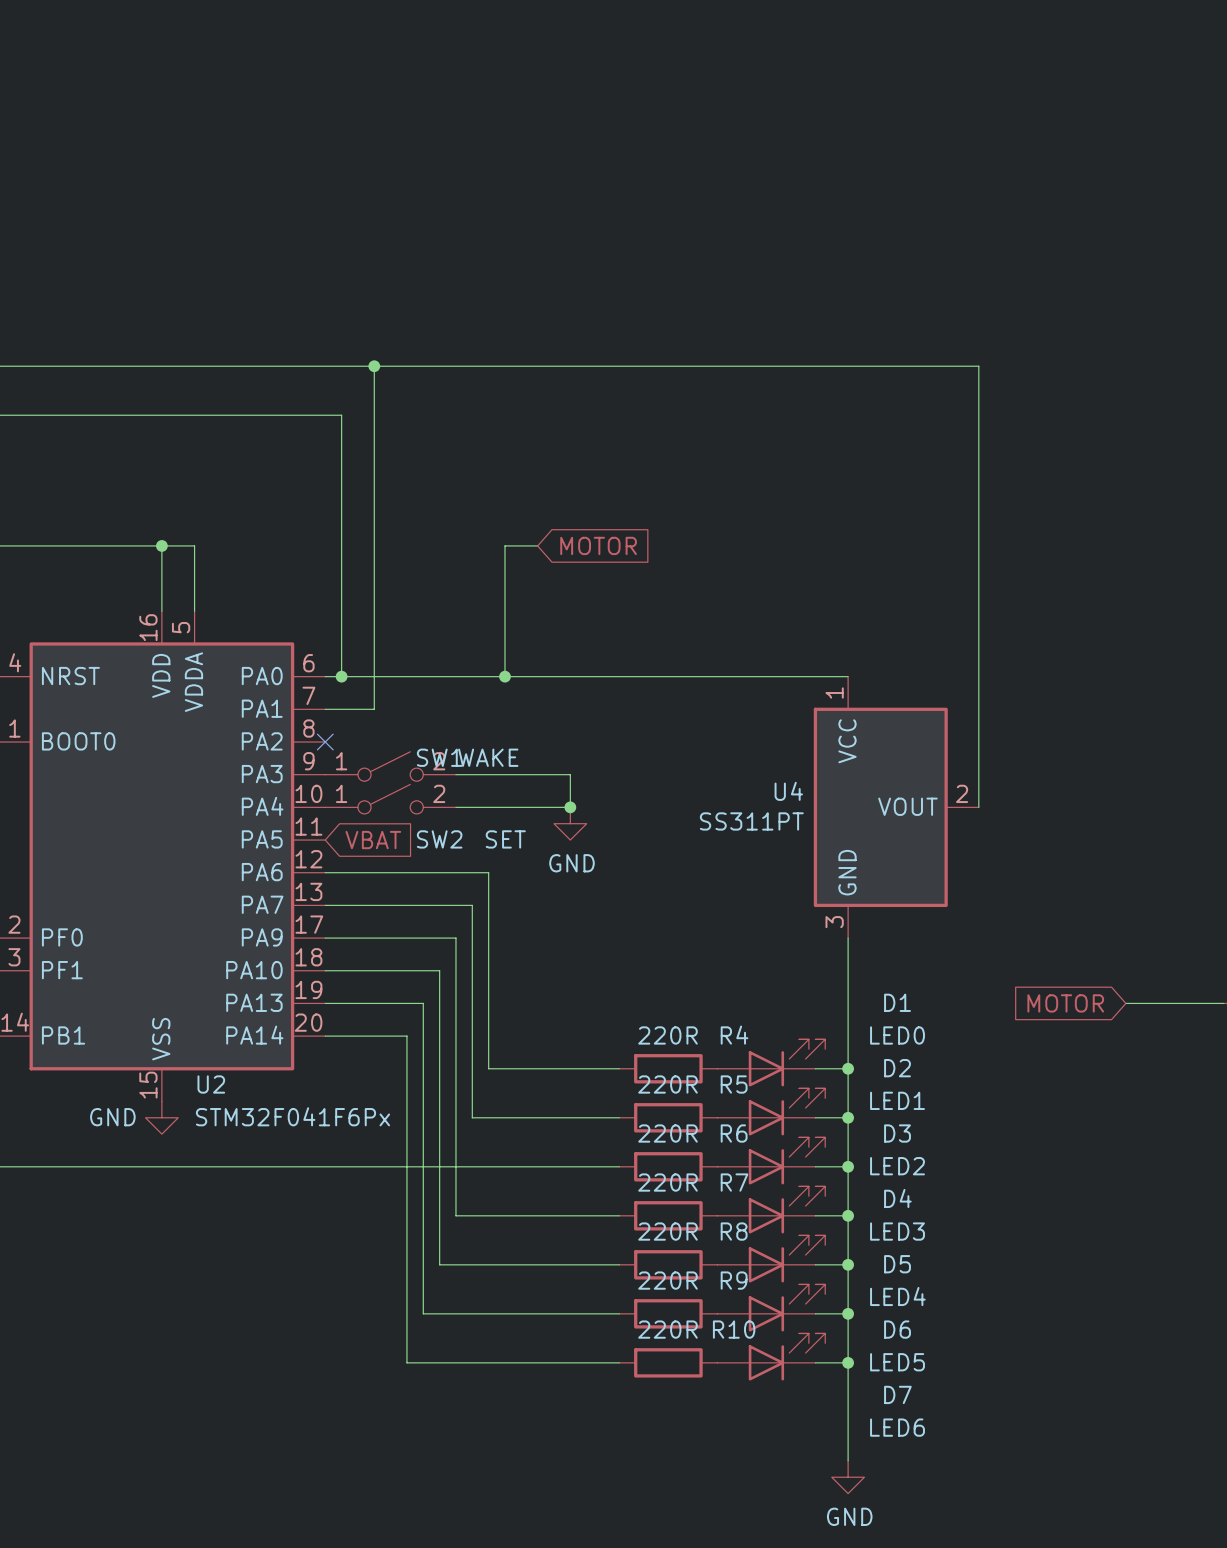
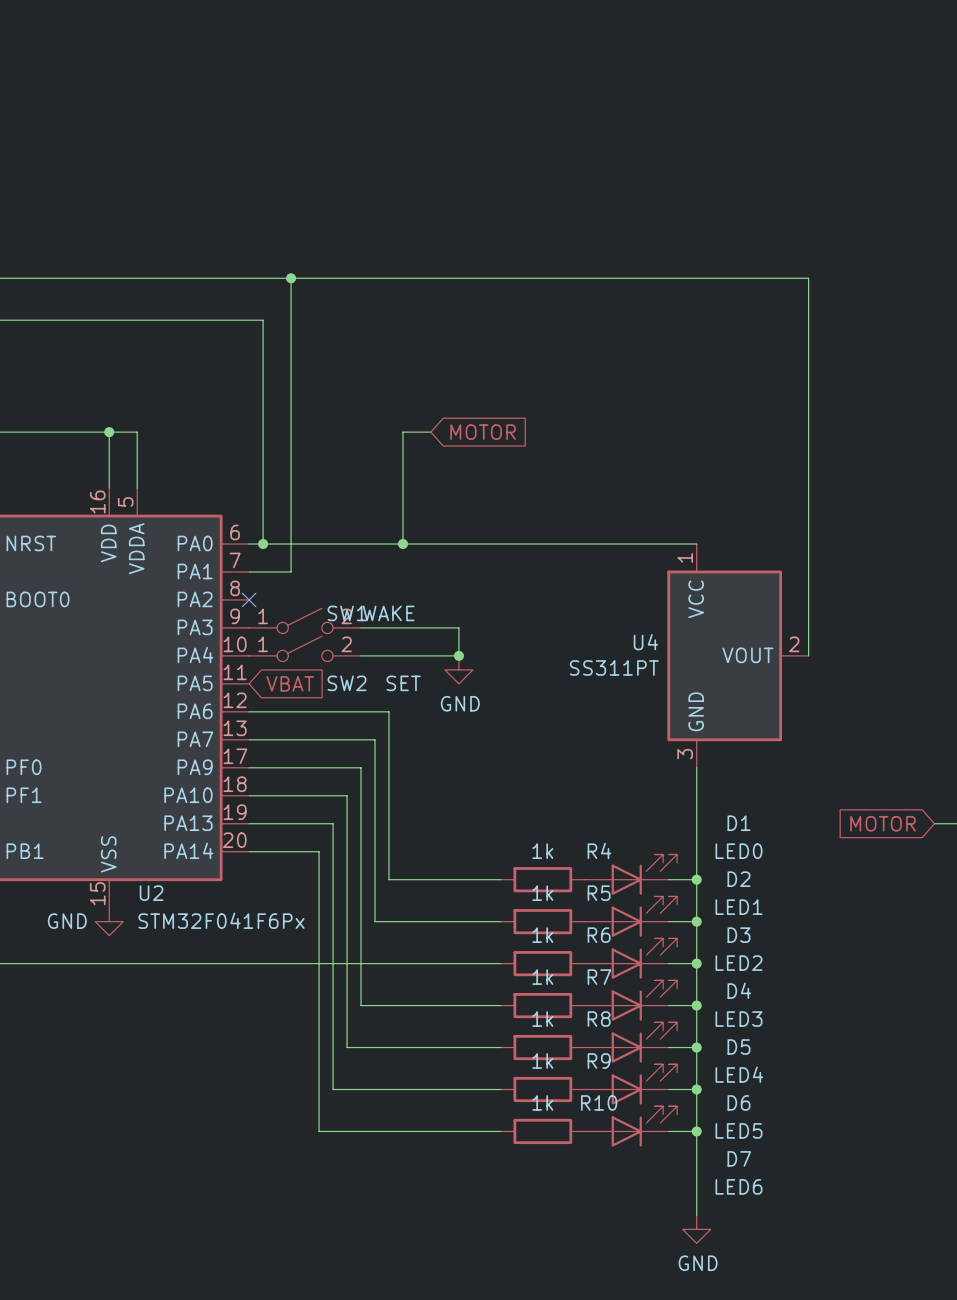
R4 value: 220R (667, 1035) -> 1k (542, 851)
R5 value: 220R (667, 1084) -> 1k (542, 893)
R6 value: 220R (667, 1133) -> 1k (542, 935)
R7 value: 220R (667, 1182) -> 1k (542, 977)
R8 value: 220R (667, 1231) -> 1k (542, 1019)
R9 value: 220R (667, 1280) -> 1k (542, 1061)
R10 value: 220R (667, 1329) -> 1k (542, 1102)

